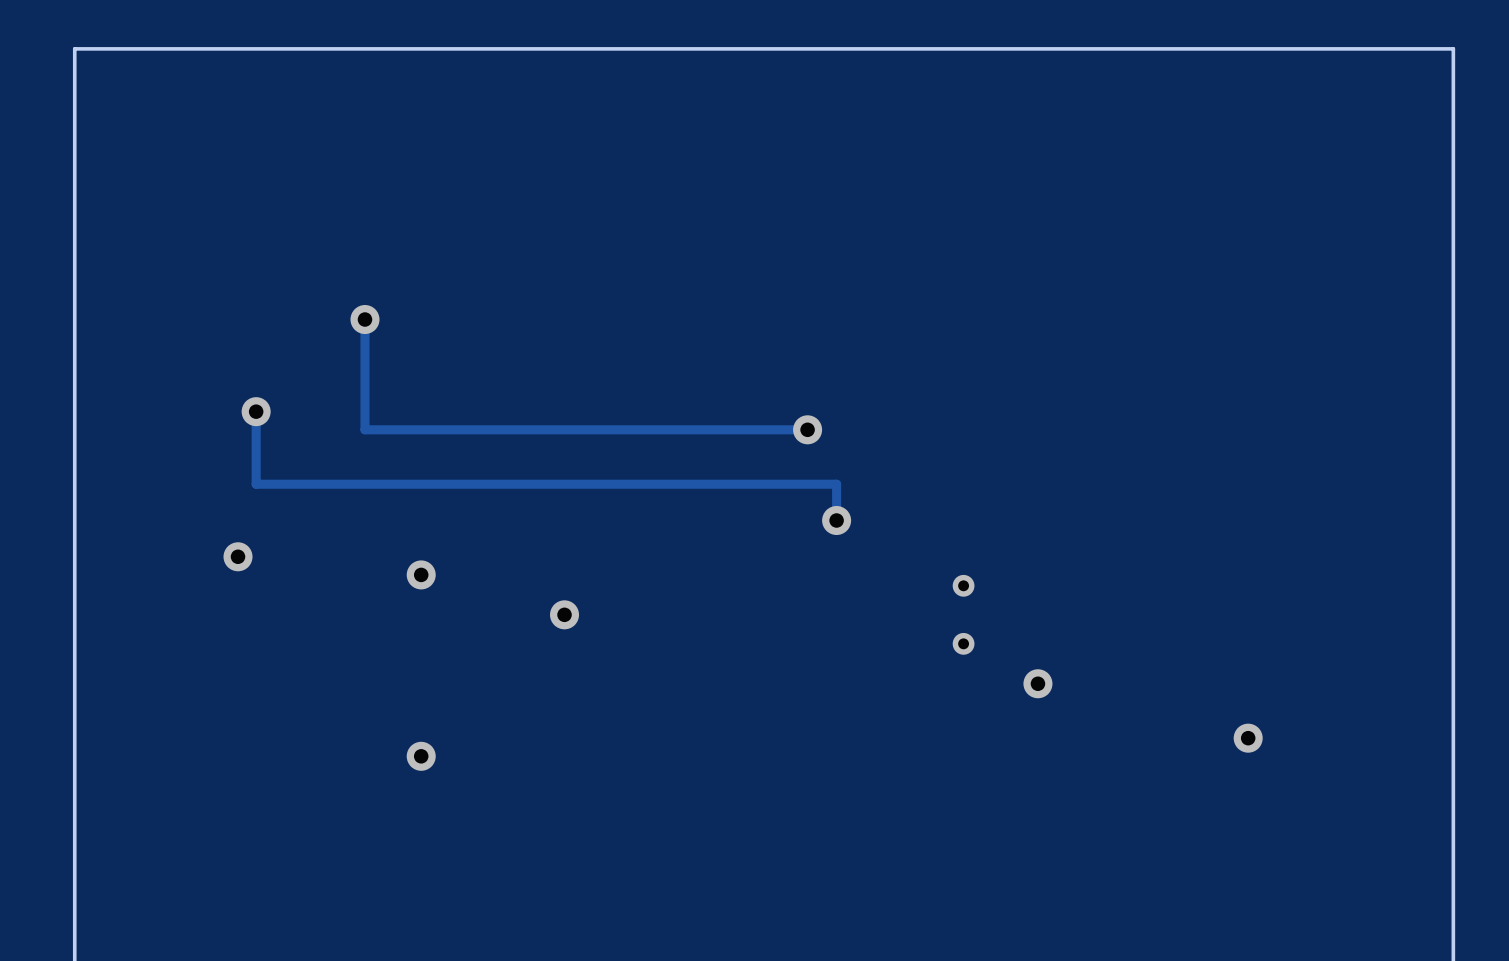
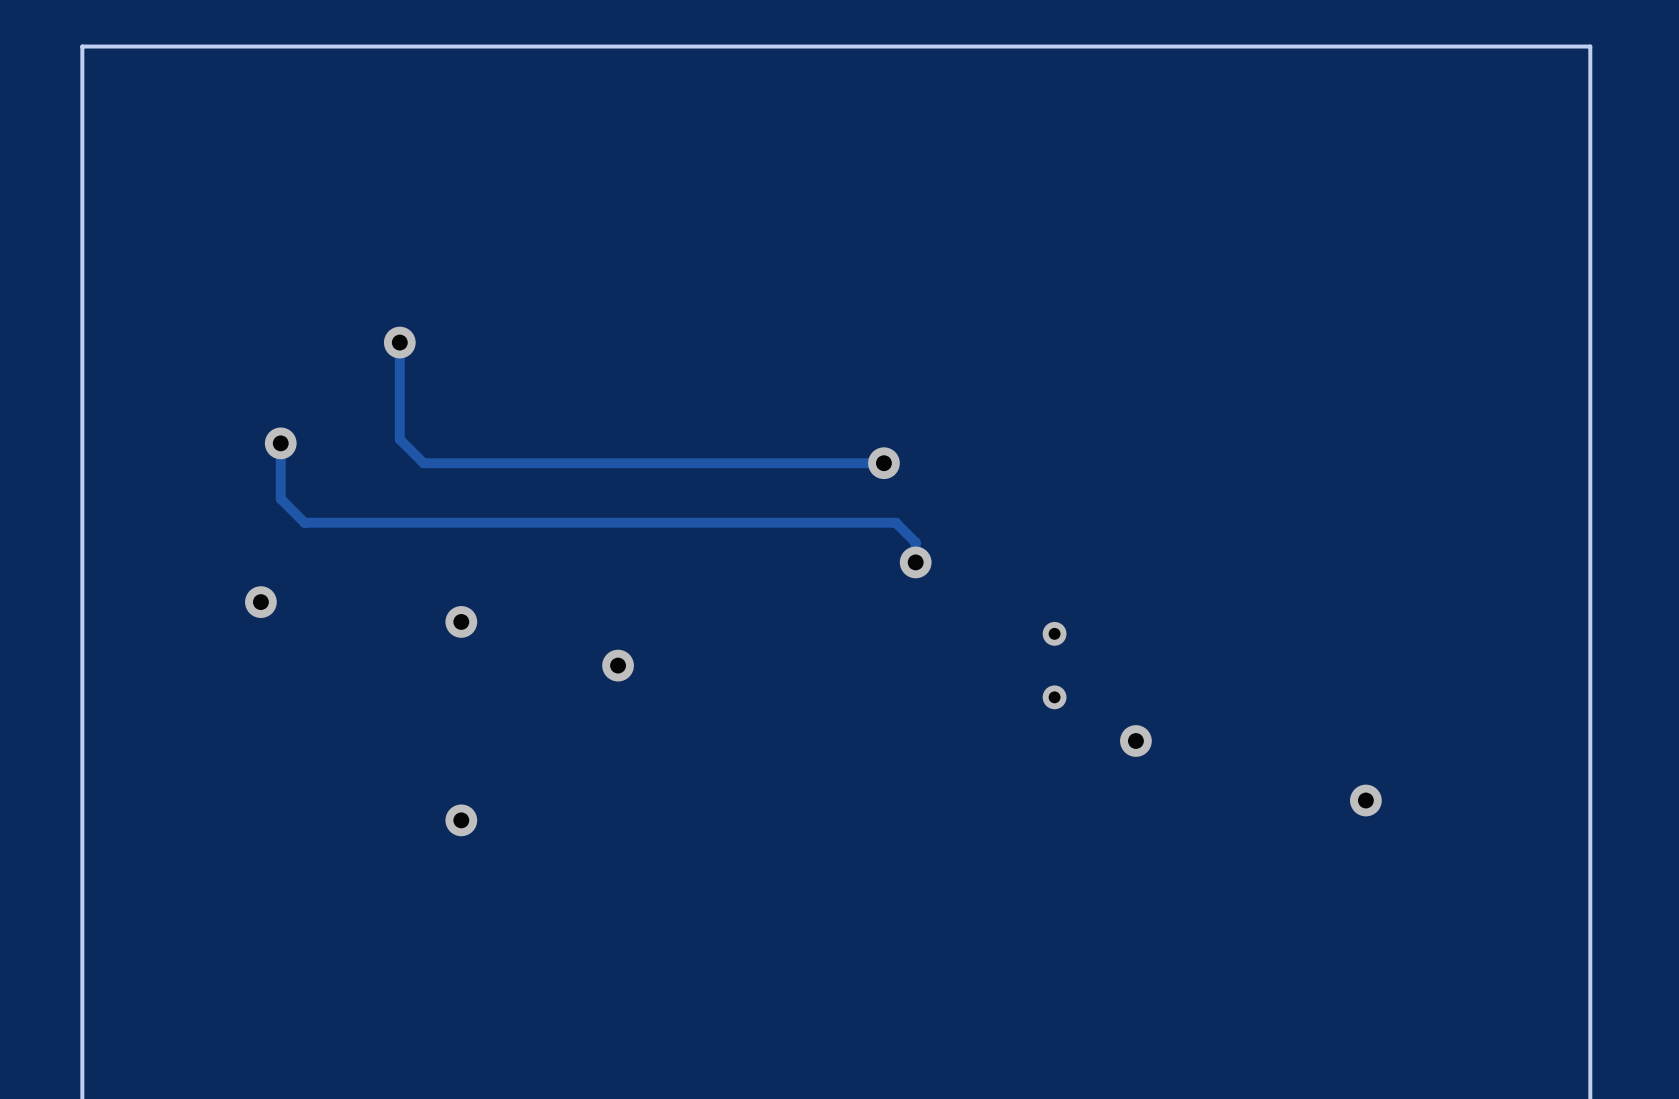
track: (364, 408) (364, 429) (386, 429) -> (399, 439) (423, 463)
track: (256, 462) (256, 484) (277, 484) -> (280, 498) (304, 522)
track: (818, 484) (836, 484) (836, 502) -> (895, 522) (915, 542)

